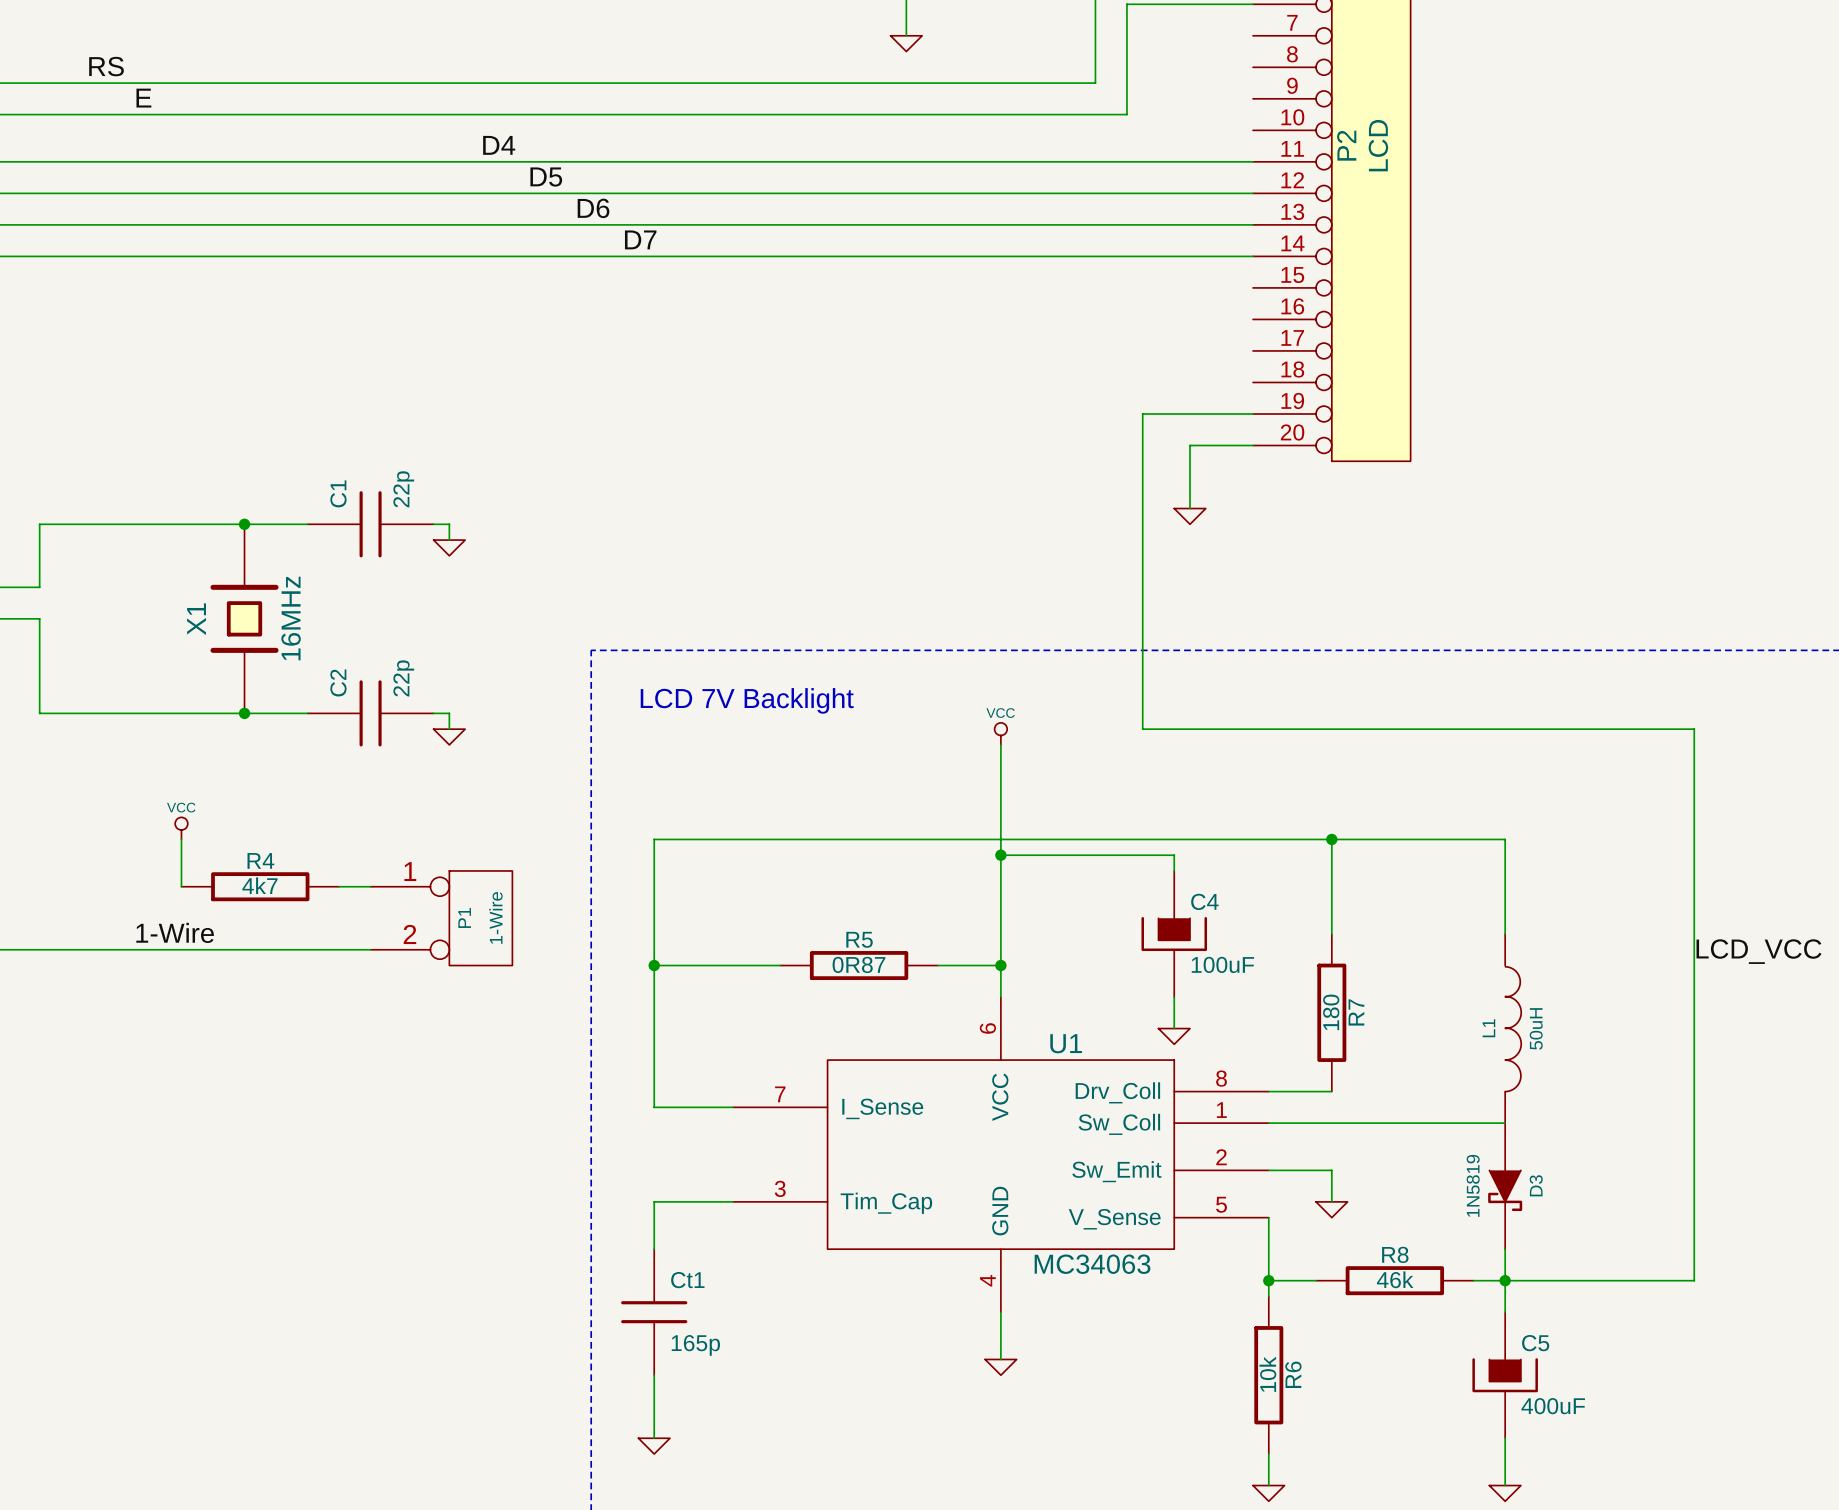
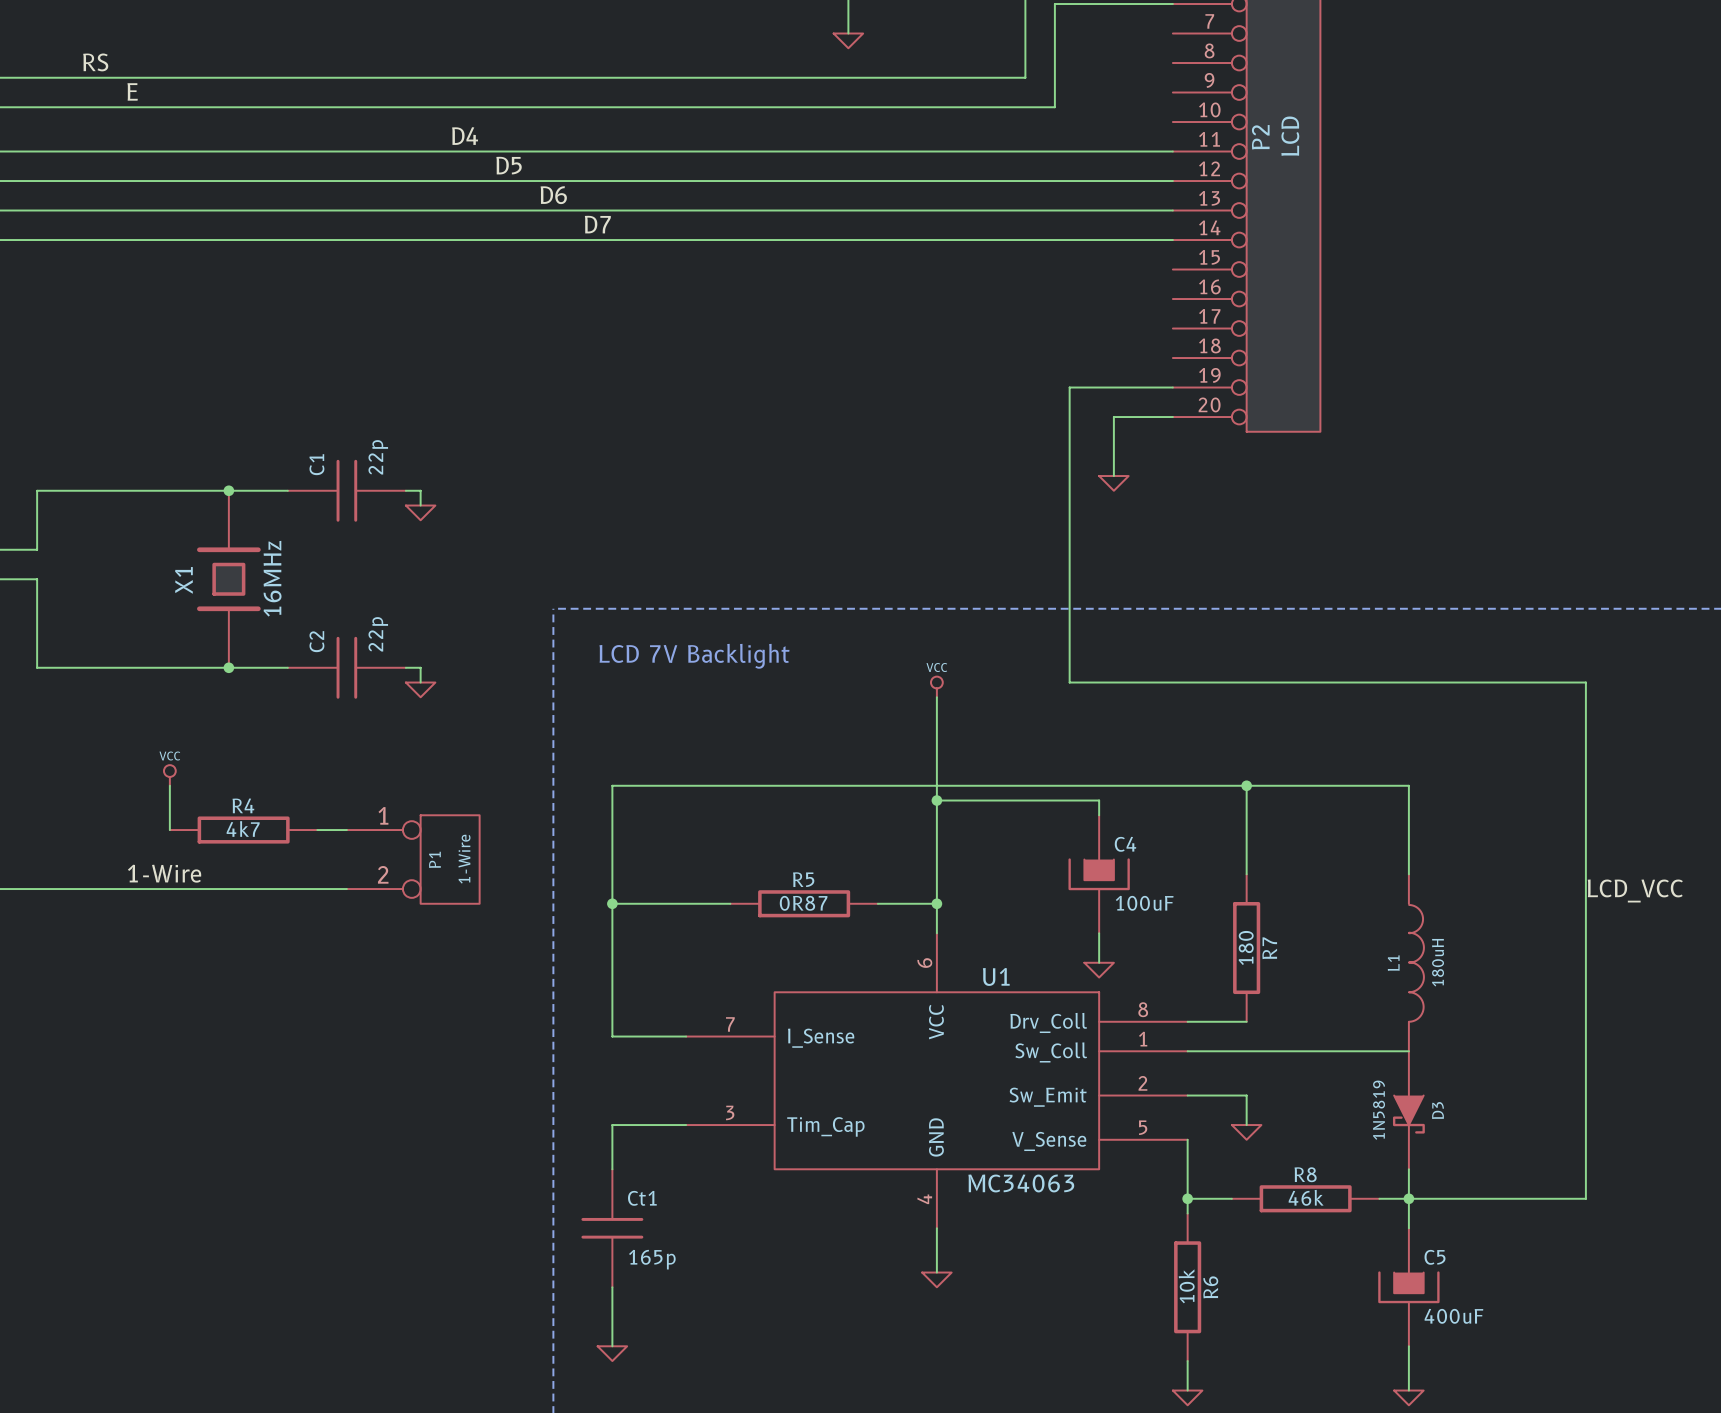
L1 value: 50uH (1536, 1028) -> 180uH (1438, 962)

